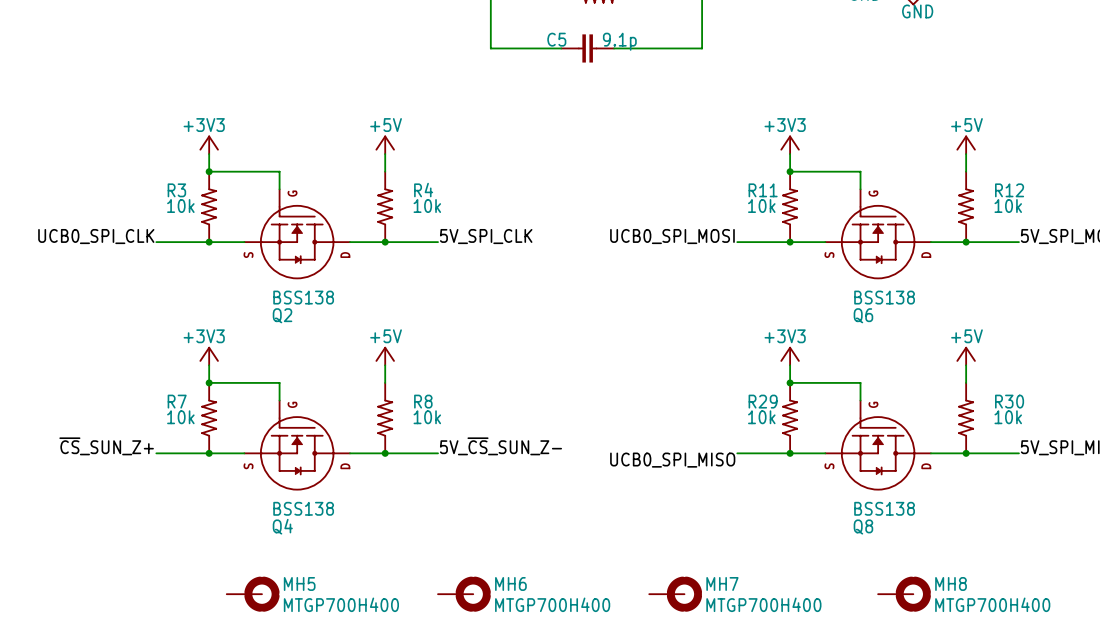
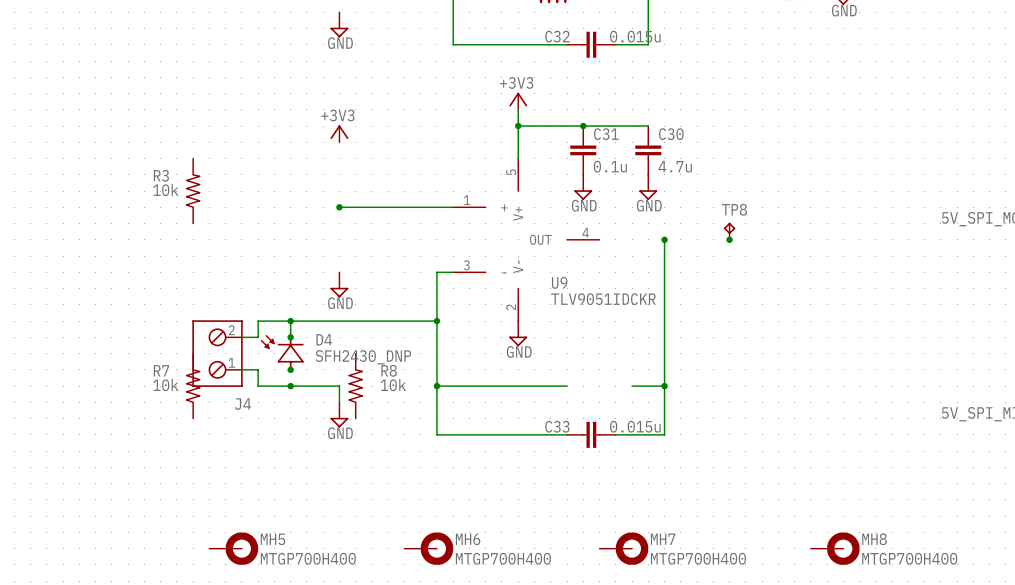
power symbol: none -> GND (339, 24)
C5: 9.1p (587, 48) -> none
C32: none -> 0.015u (591, 44)
power symbol: none -> +3V3 (518, 101)
wire: none -> (518, 109) (518, 158)
wire: none -> (518, 126) (648, 126)
junction: none -> (518, 126)
junction: none -> (583, 126)
power symbol: +3V3 (209, 144) -> none
power symbol: none -> +3V3 (339, 133)
power symbol: +5V (385, 144) -> none
power symbol: +3V3 (790, 144) -> none
power symbol: +5V (966, 144) -> none
wire: (209, 154) (209, 171) (279, 171) (279, 189) -> none
wire: (385, 154) (385, 171) -> none
wire: (790, 154) (790, 171) (860, 171) (860, 189) -> none
wire: (966, 154) (966, 171) -> none
C31: none -> 0.1u (583, 150)
C30: none -> 4.7u (648, 150)
junction: (209, 171) -> none
junction: (790, 171) -> none
power symbol: none -> GND (583, 187)
power symbol: none -> GND (648, 187)
R4: 10k (385, 206) -> none
R11: 10k (790, 206) -> none
R12: 10k (966, 206) -> none
wire: none -> (339, 207) (453, 207)
Q2: BSS138 (297, 234) -> none
Q6: BSS138 (878, 234) -> none
label: UCB0_SPI_CLK (96, 236) -> none
label: 5V_SPI_CLK (486, 236) -> none
label: UCB0_SPI_MOSI (672, 236) -> none
wire: (156, 242) (244, 242) -> none
junction: (209, 242) -> none
wire: (349, 242) (438, 242) -> none
junction position: (385, 242) -> (339, 207)
wire: (737, 242) (825, 242) -> none
junction position: (790, 242) -> (729, 239)
wire: (930, 242) (1018, 242) -> none
junction: (966, 242) -> none
TP8: none -> (729, 231)
U9: none -> TLV9051IDCKR (526, 239)
wire: none -> (664, 239) (664, 434) (615, 434)
junction: none -> (664, 239)
wire: none -> (453, 272) (436, 272) (436, 434) (567, 434)
power symbol: none -> GND (339, 284)
junction: none -> (290, 321)
wire: none -> (436, 321) (258, 321) (258, 337) (241, 337)
junction: none -> (436, 321)
power symbol: +3V3 (209, 356) -> none
power symbol: +5V (385, 356) -> none
power symbol: +3V3 (790, 356) -> none
power symbol: +5V (966, 356) -> none
power symbol: none -> GND (518, 333)
wire: (209, 365) (209, 382) (279, 382) (279, 400) -> none
junction: none -> (290, 337)
wire: (385, 365) (385, 382) -> (290, 321) (290, 337)
wire: (790, 365) (790, 382) (860, 382) (860, 400) -> none
wire: (966, 365) (966, 382) -> none
junction: (209, 382) -> none
J4: none -> (217, 353)
D4: none -> SFH2430_DNP (282, 352)
junction: (790, 382) -> none
wire: none -> (241, 369) (258, 369) (258, 386) (339, 386) (339, 402)
junction: none -> (290, 369)
junction: none -> (290, 386)
wire: none -> (436, 386) (567, 386)
junction: none -> (436, 386)
wire: none -> (632, 386) (664, 386)
junction: none -> (664, 386)
R29: 10k (790, 418) -> none
R30: 10k (966, 418) -> none
Q4: BSS138 (297, 445) -> none
Q8: BSS138 (878, 445) -> none
label: ~{CS}_SUN_Z+ (106, 446) -> none
label: 5V_~{CS}_SUN_Z- (500, 446) -> none
power symbol: none -> GND (339, 414)
wire: (156, 453) (244, 453) -> none
junction: (209, 453) -> none
wire: (349, 453) (438, 453) -> none
junction: (385, 453) -> none
wire: (737, 453) (825, 453) -> none
junction: (790, 453) -> none
wire: (930, 453) (1018, 453) -> none
junction: (966, 453) -> none
label: UCB0_SPI_MISO (672, 460) -> none
C33: none -> 0.015u (591, 434)

